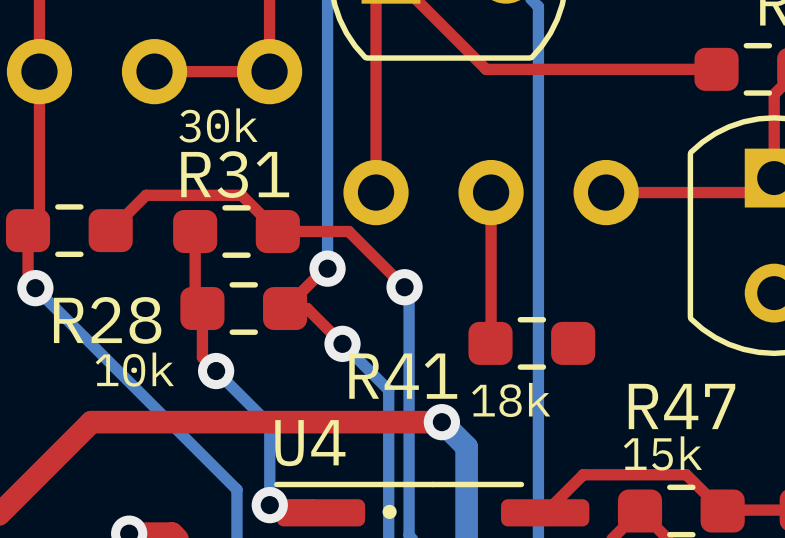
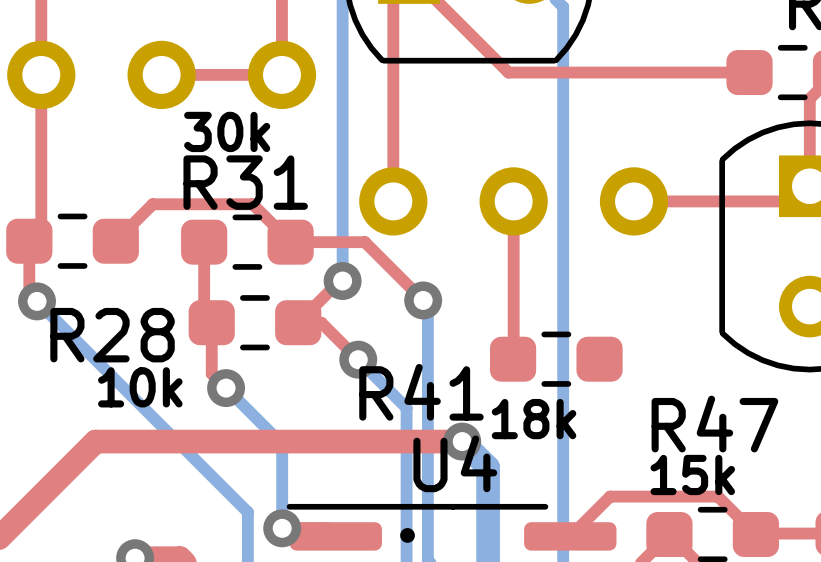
U4 name position: U4 (310, 443) -> U4 (455, 463)

